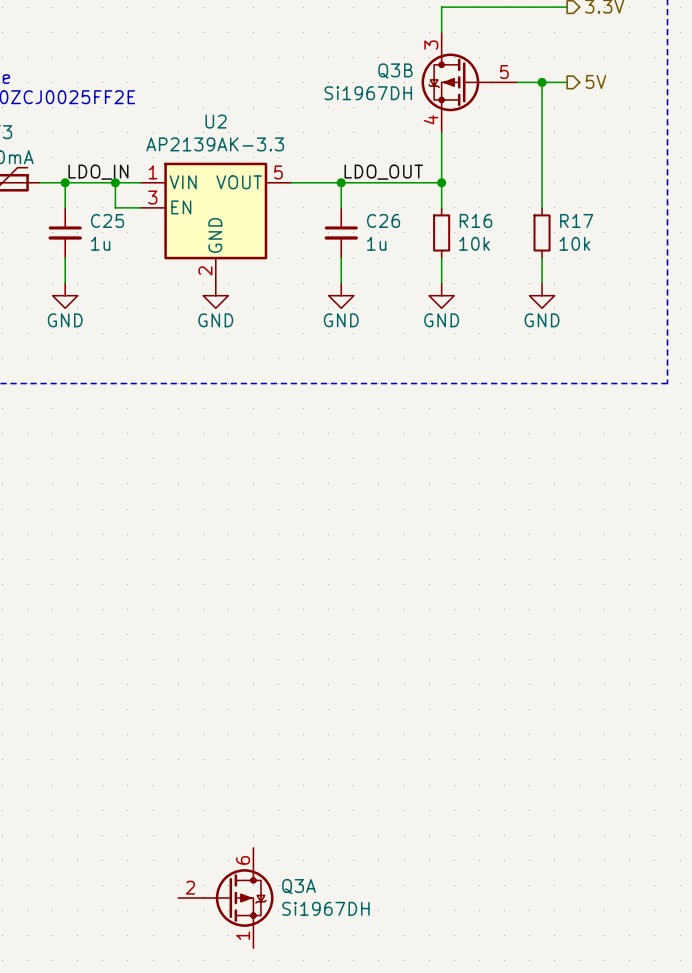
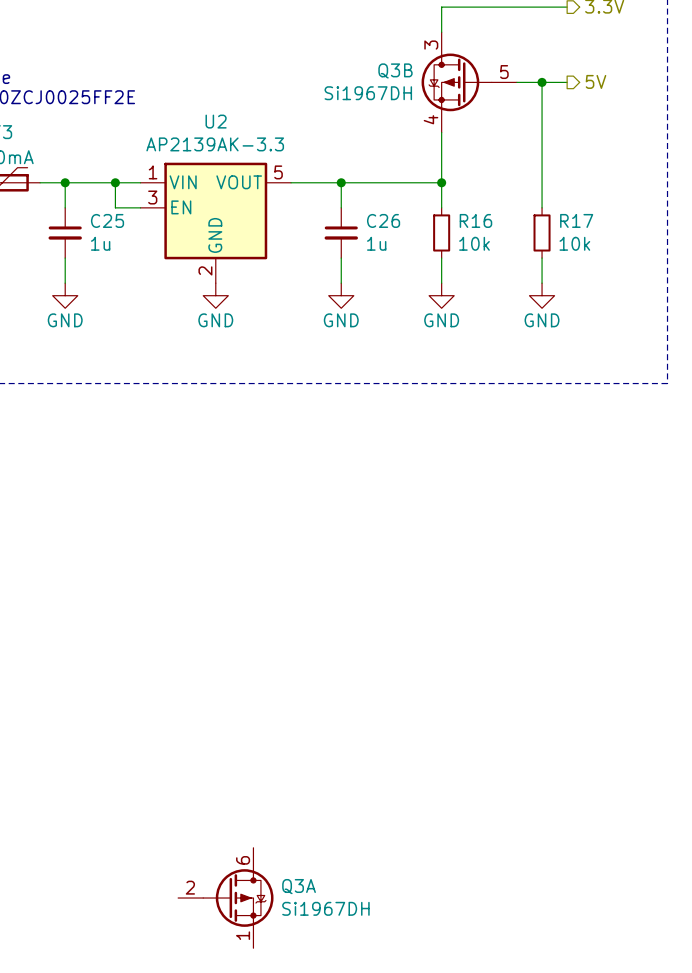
label: LDO_IN (98, 172) -> none
label: LDO_OUT (383, 172) -> none

